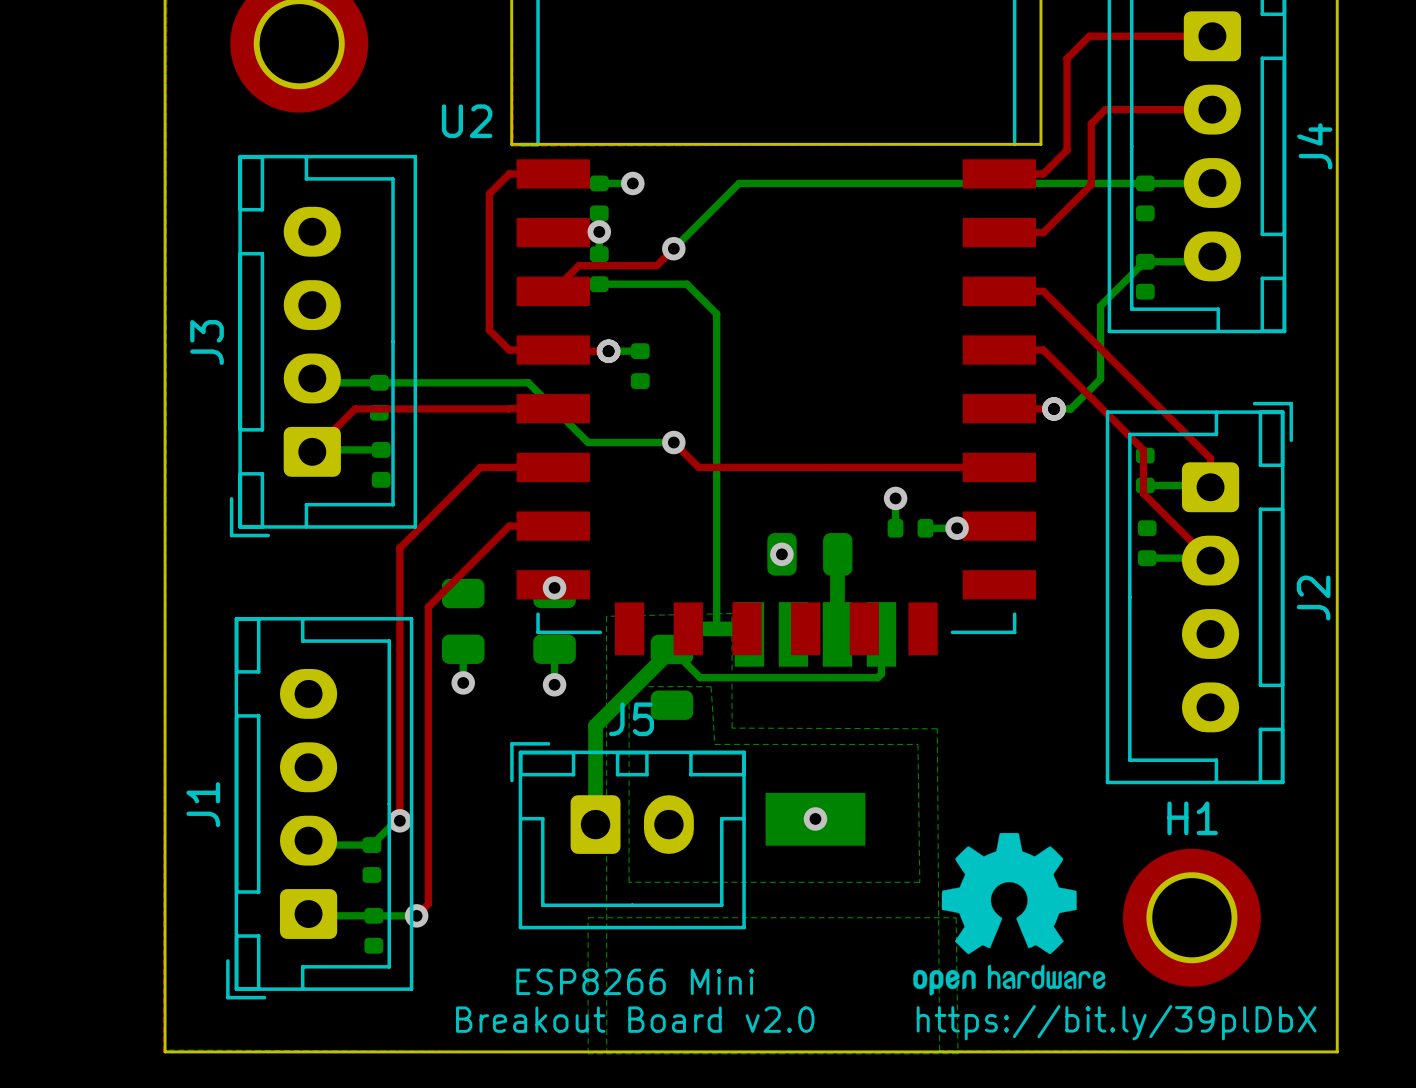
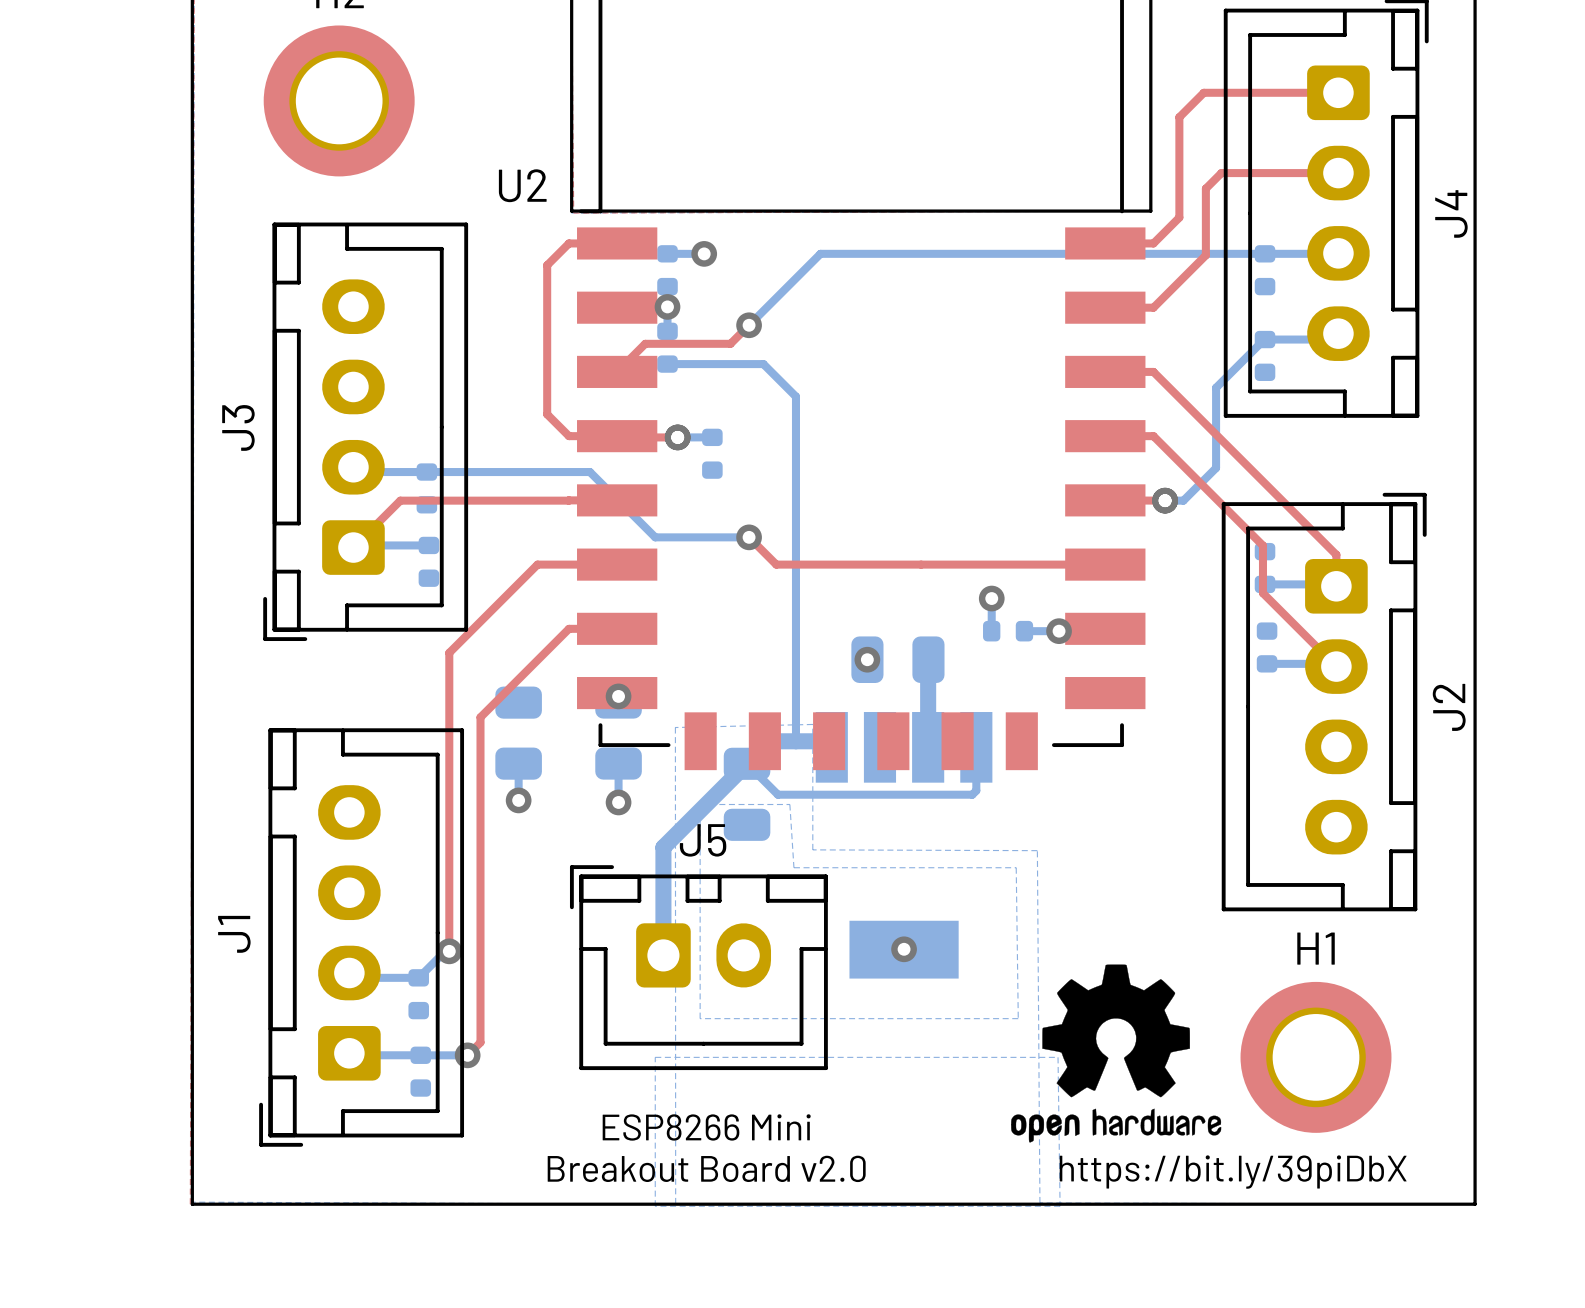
text: https://bit.ly/39plDbX (1116, 1022) -> https://bit.ly/39piDbX (1233, 1172)

